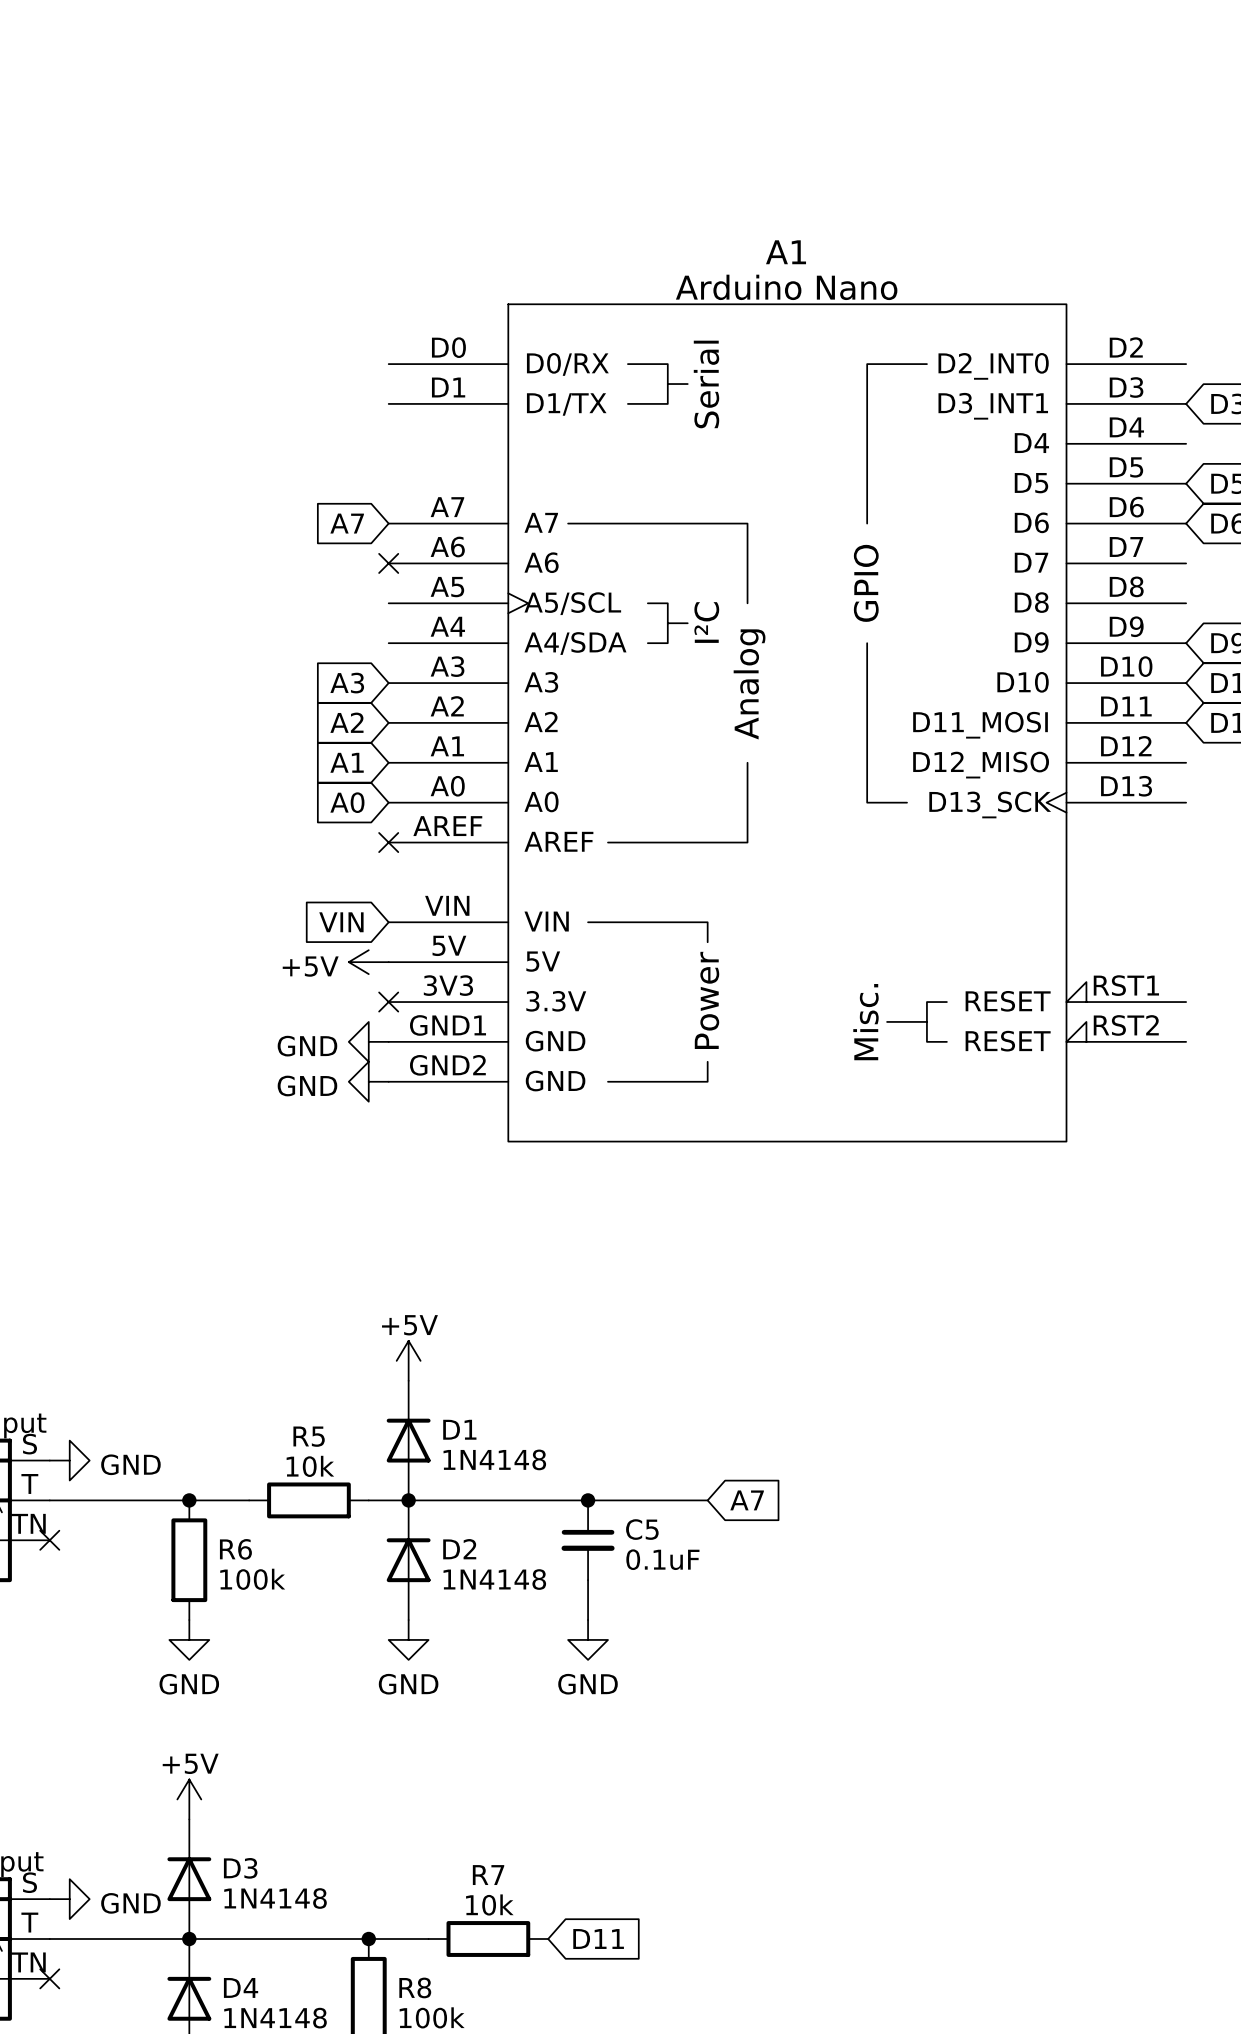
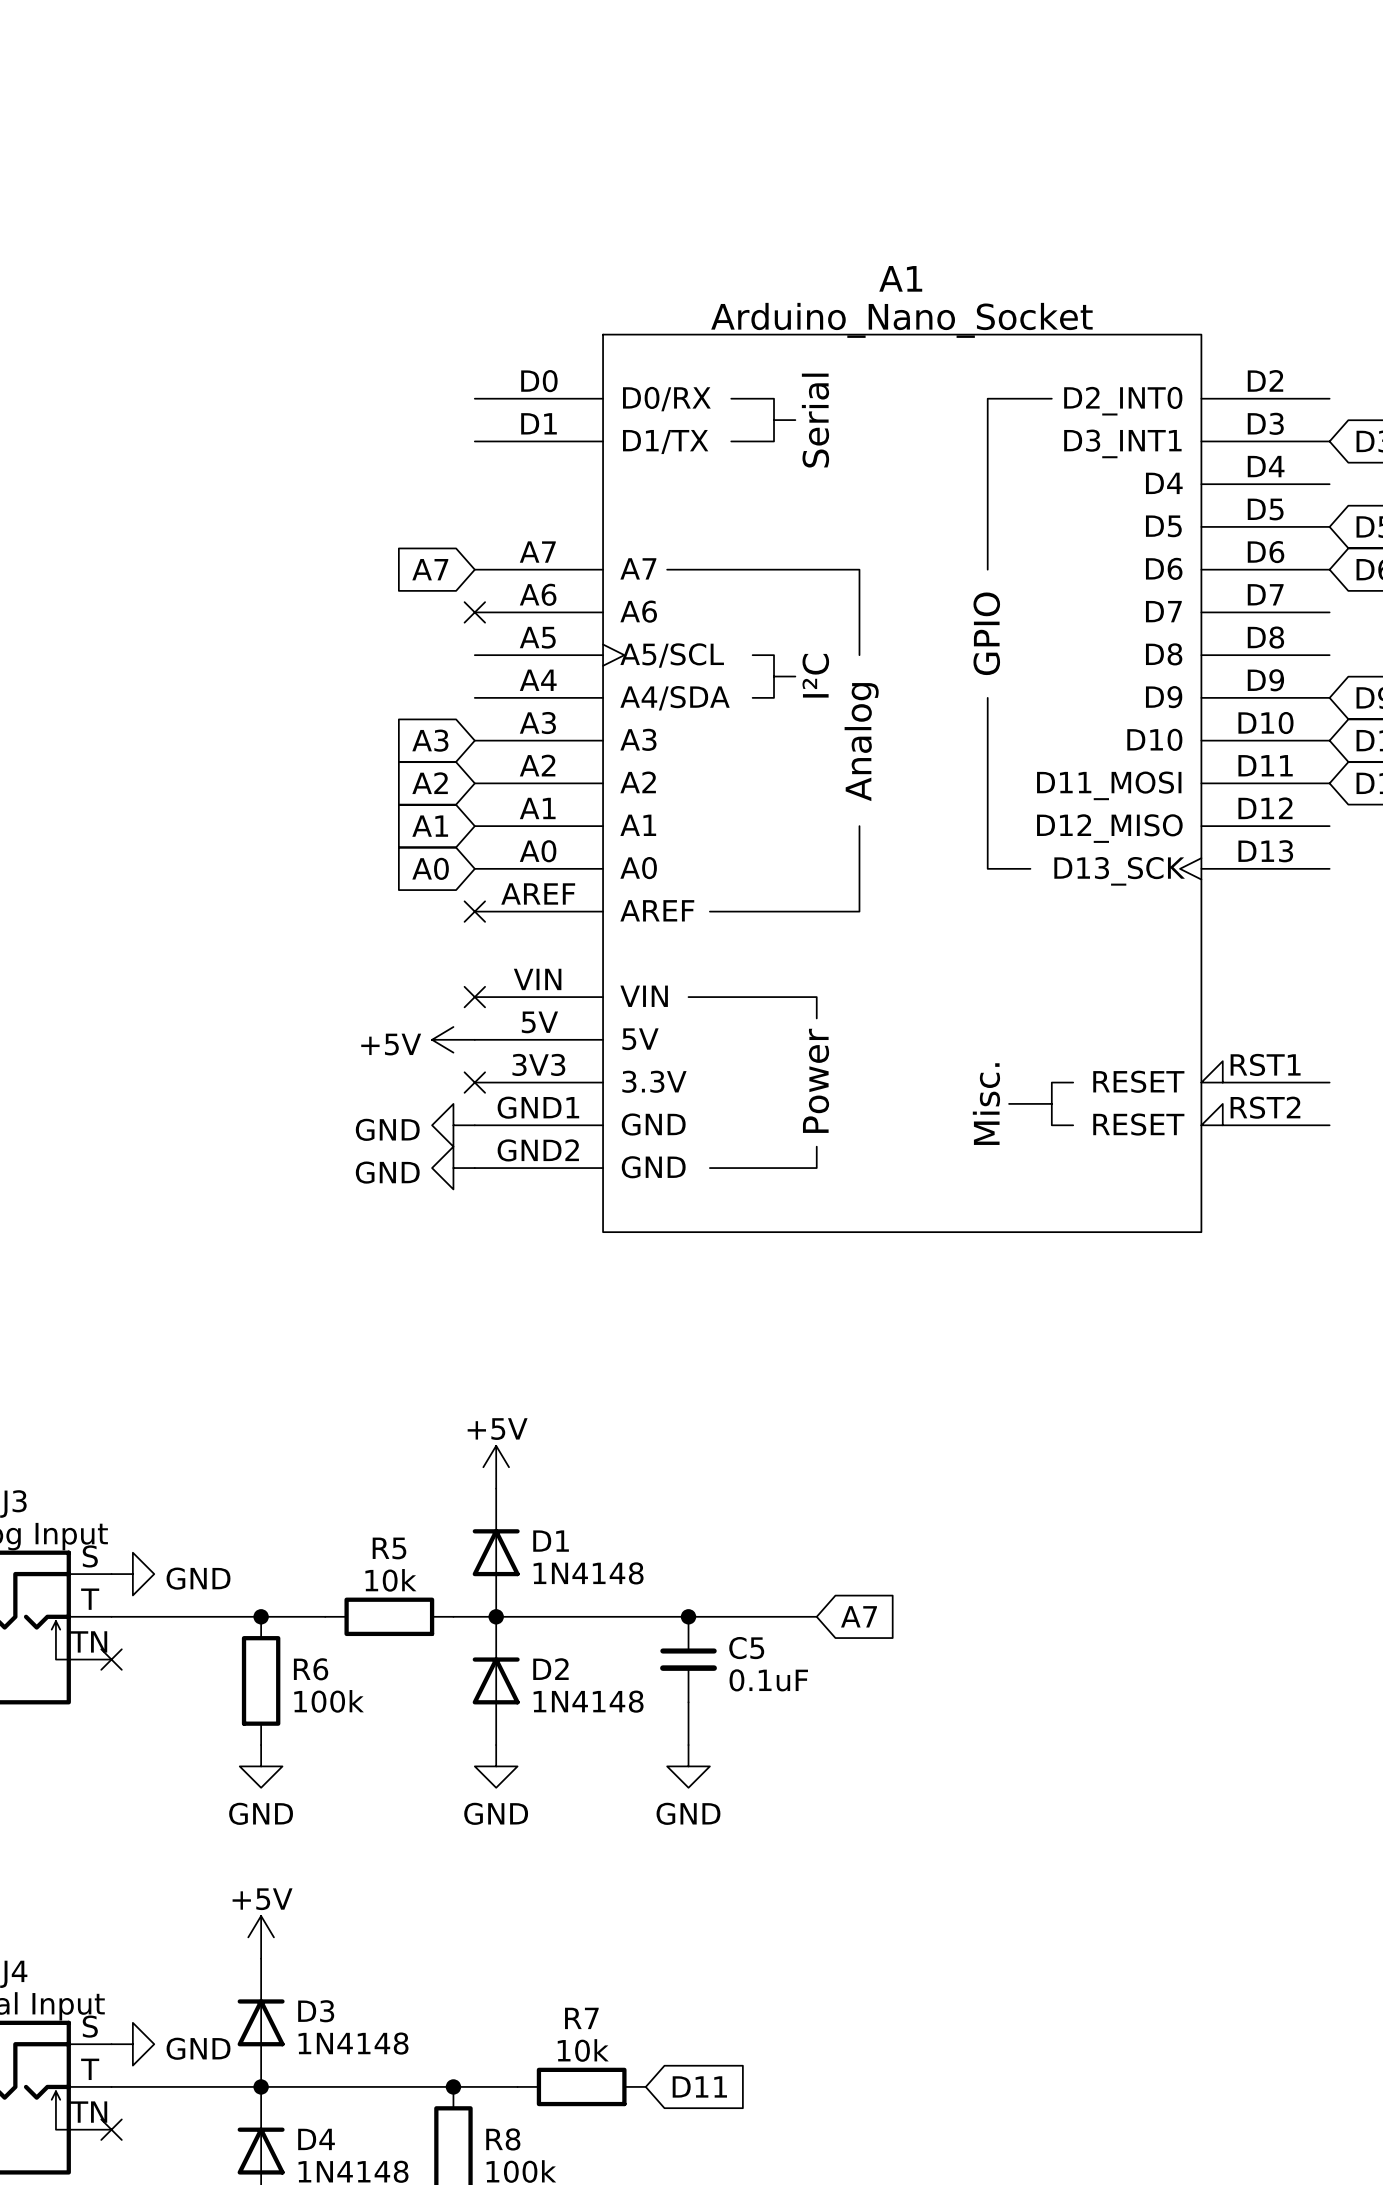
A1 value: Arduino Nano (786, 287) -> Arduino_Nano_Socket (901, 320)
global label: VIN (341, 922) -> none
no-connect mark: none -> (474, 997)

